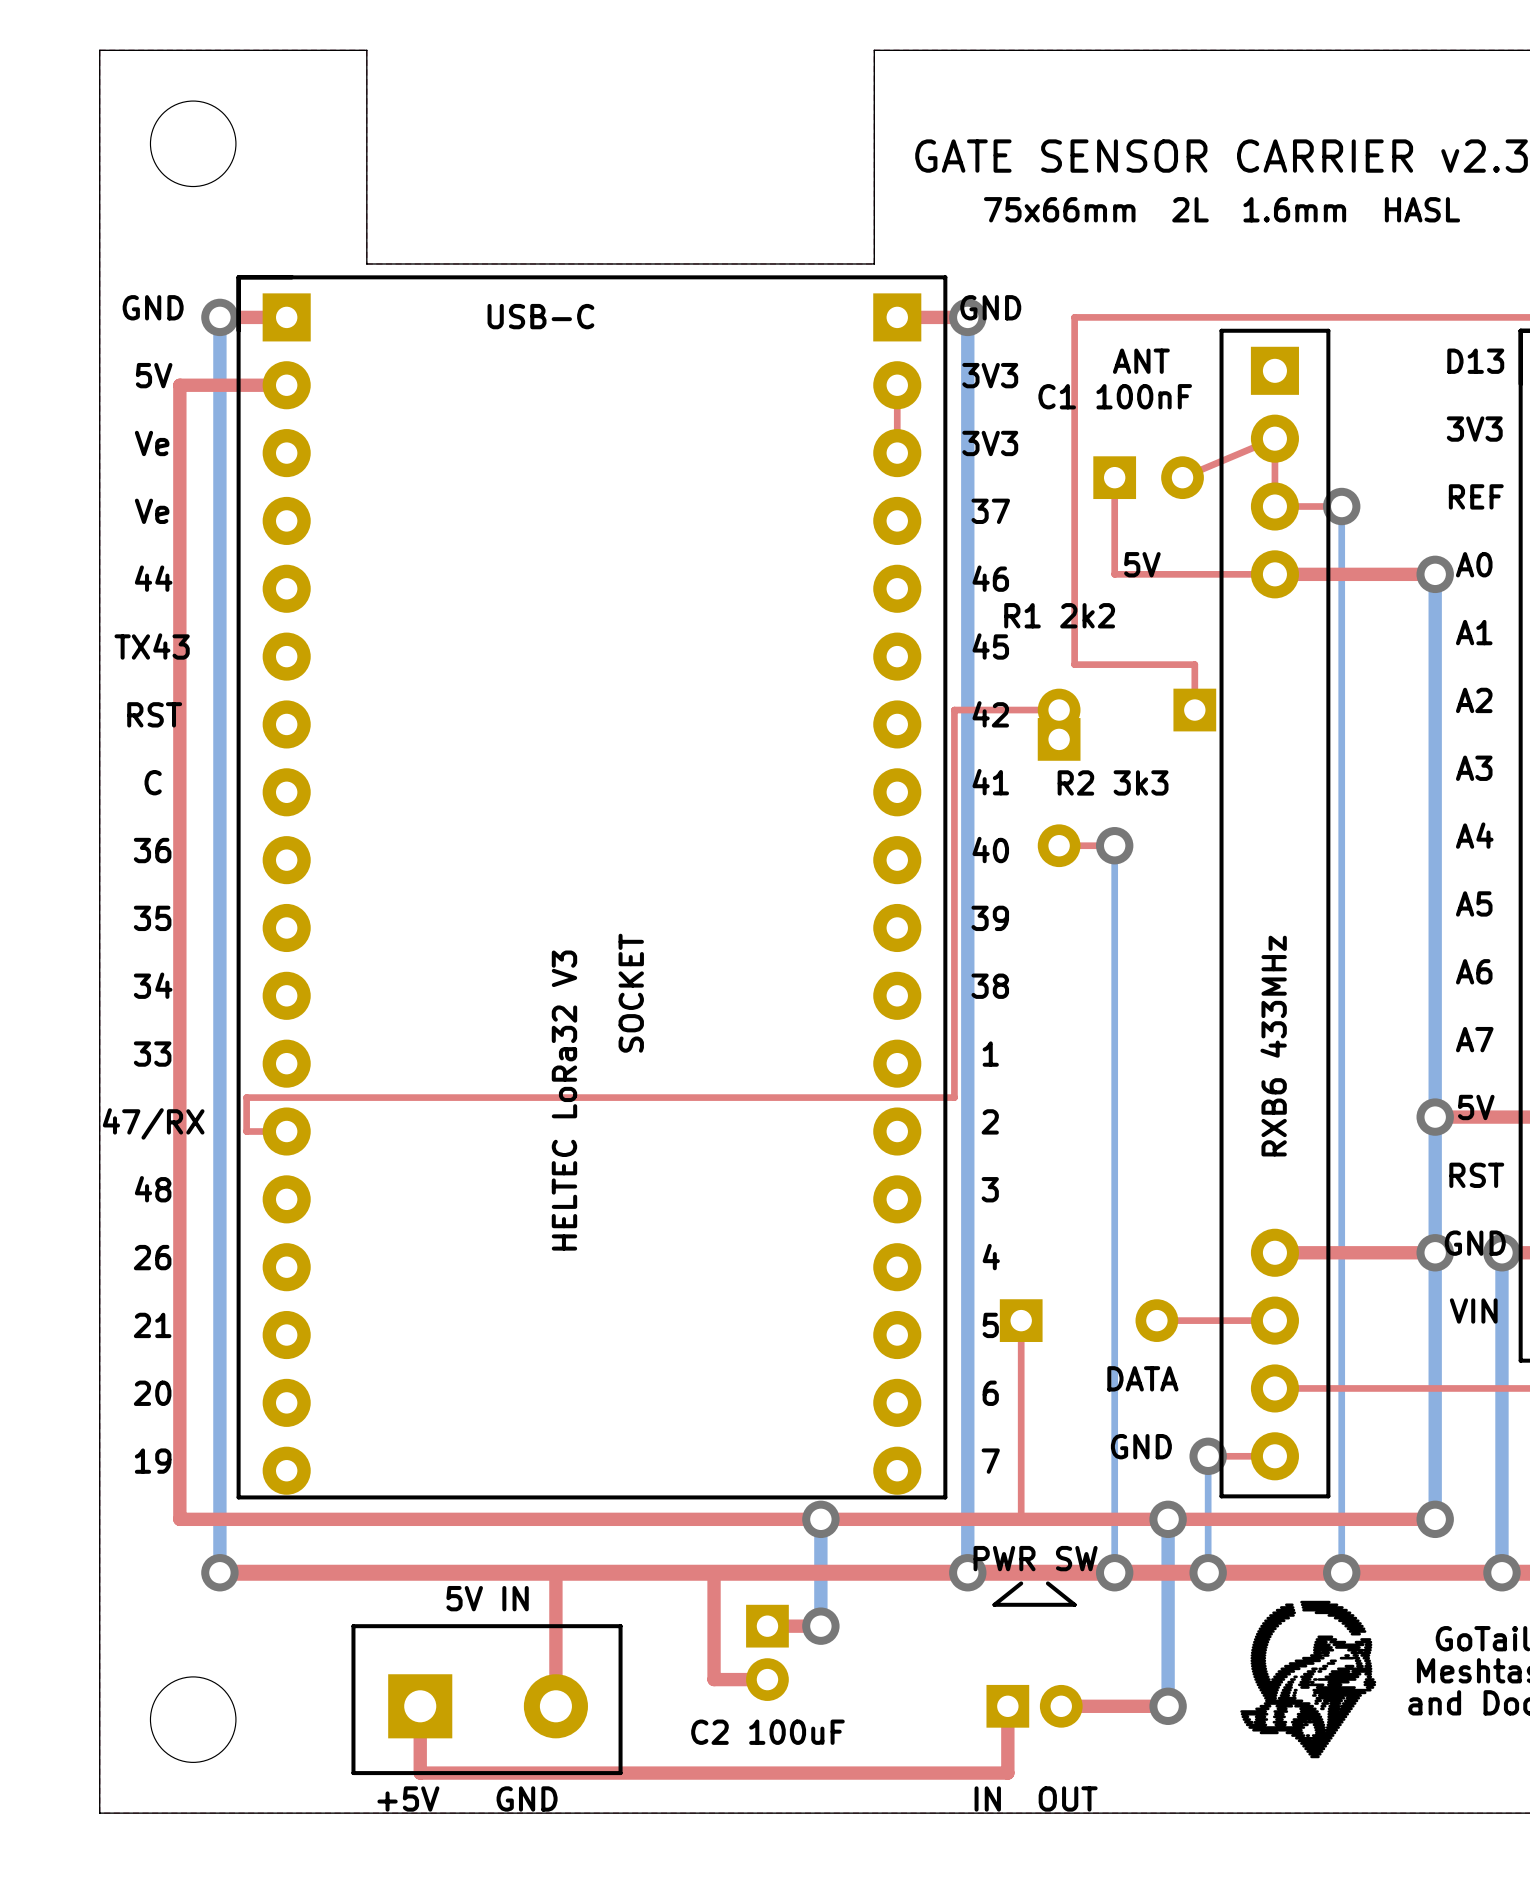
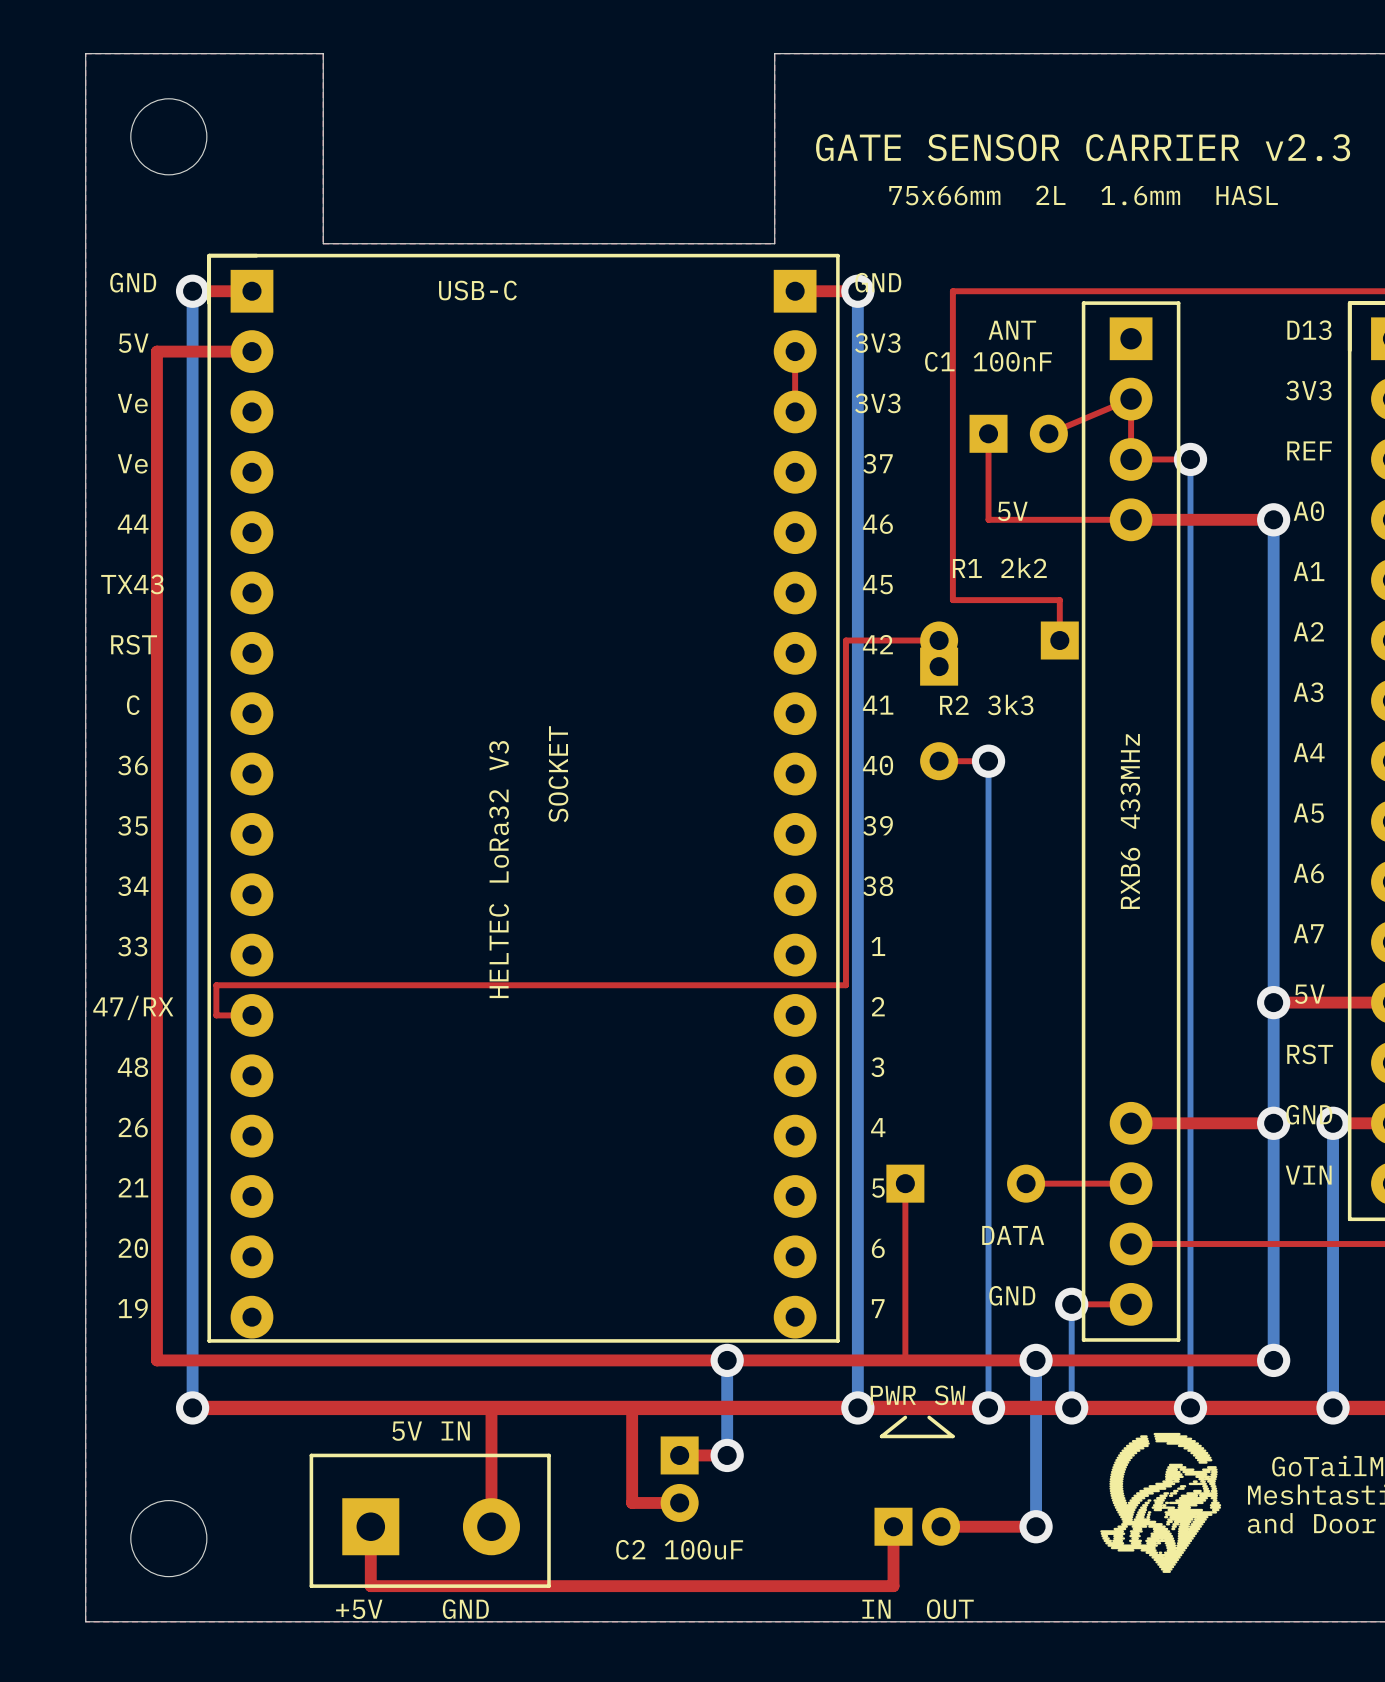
text position: R1 2k2 (1059, 615) -> R1 2k2 (999, 567)
text position: SOCKET (631, 993) -> SOCKET (558, 774)
text position: RXB6 433MHz (1273, 1046) -> RXB6 433MHz (1130, 821)
text position: HELTEC LoRa32 V3 (564, 1100) -> HELTEC LoRa32 V3 (499, 869)

